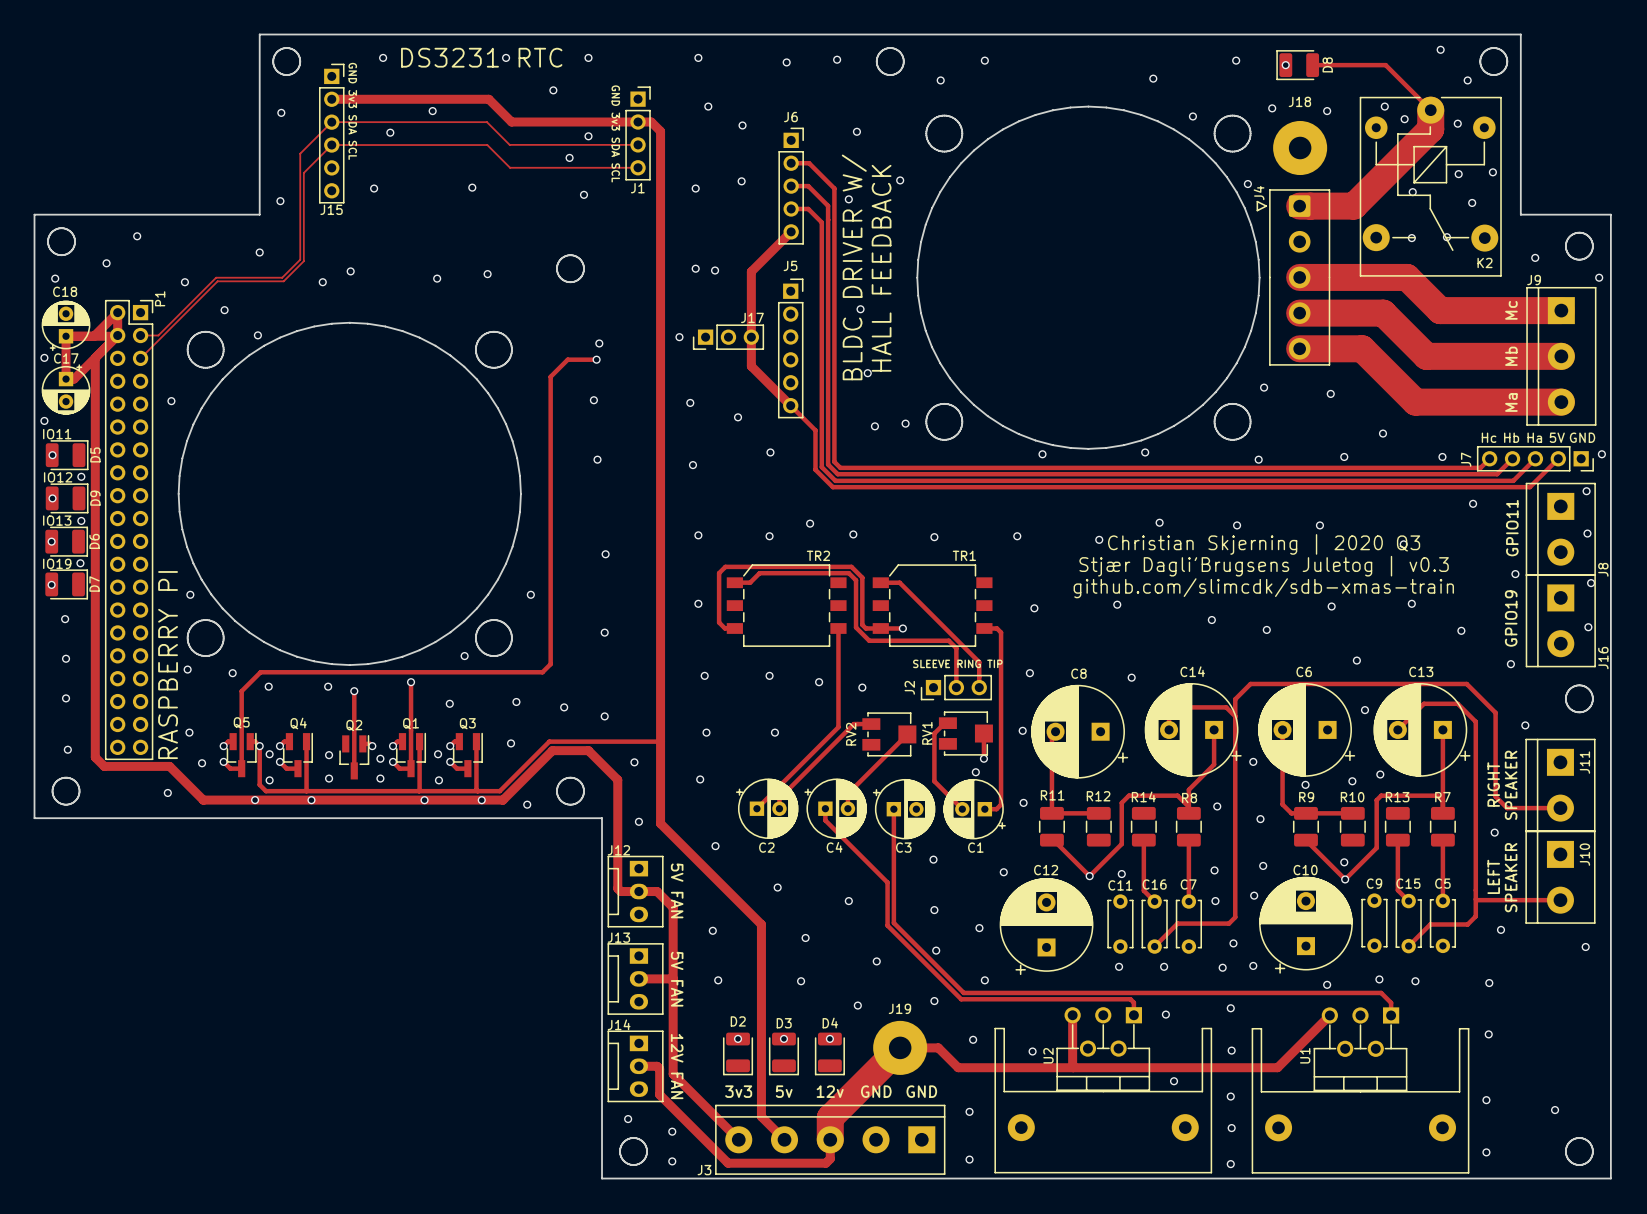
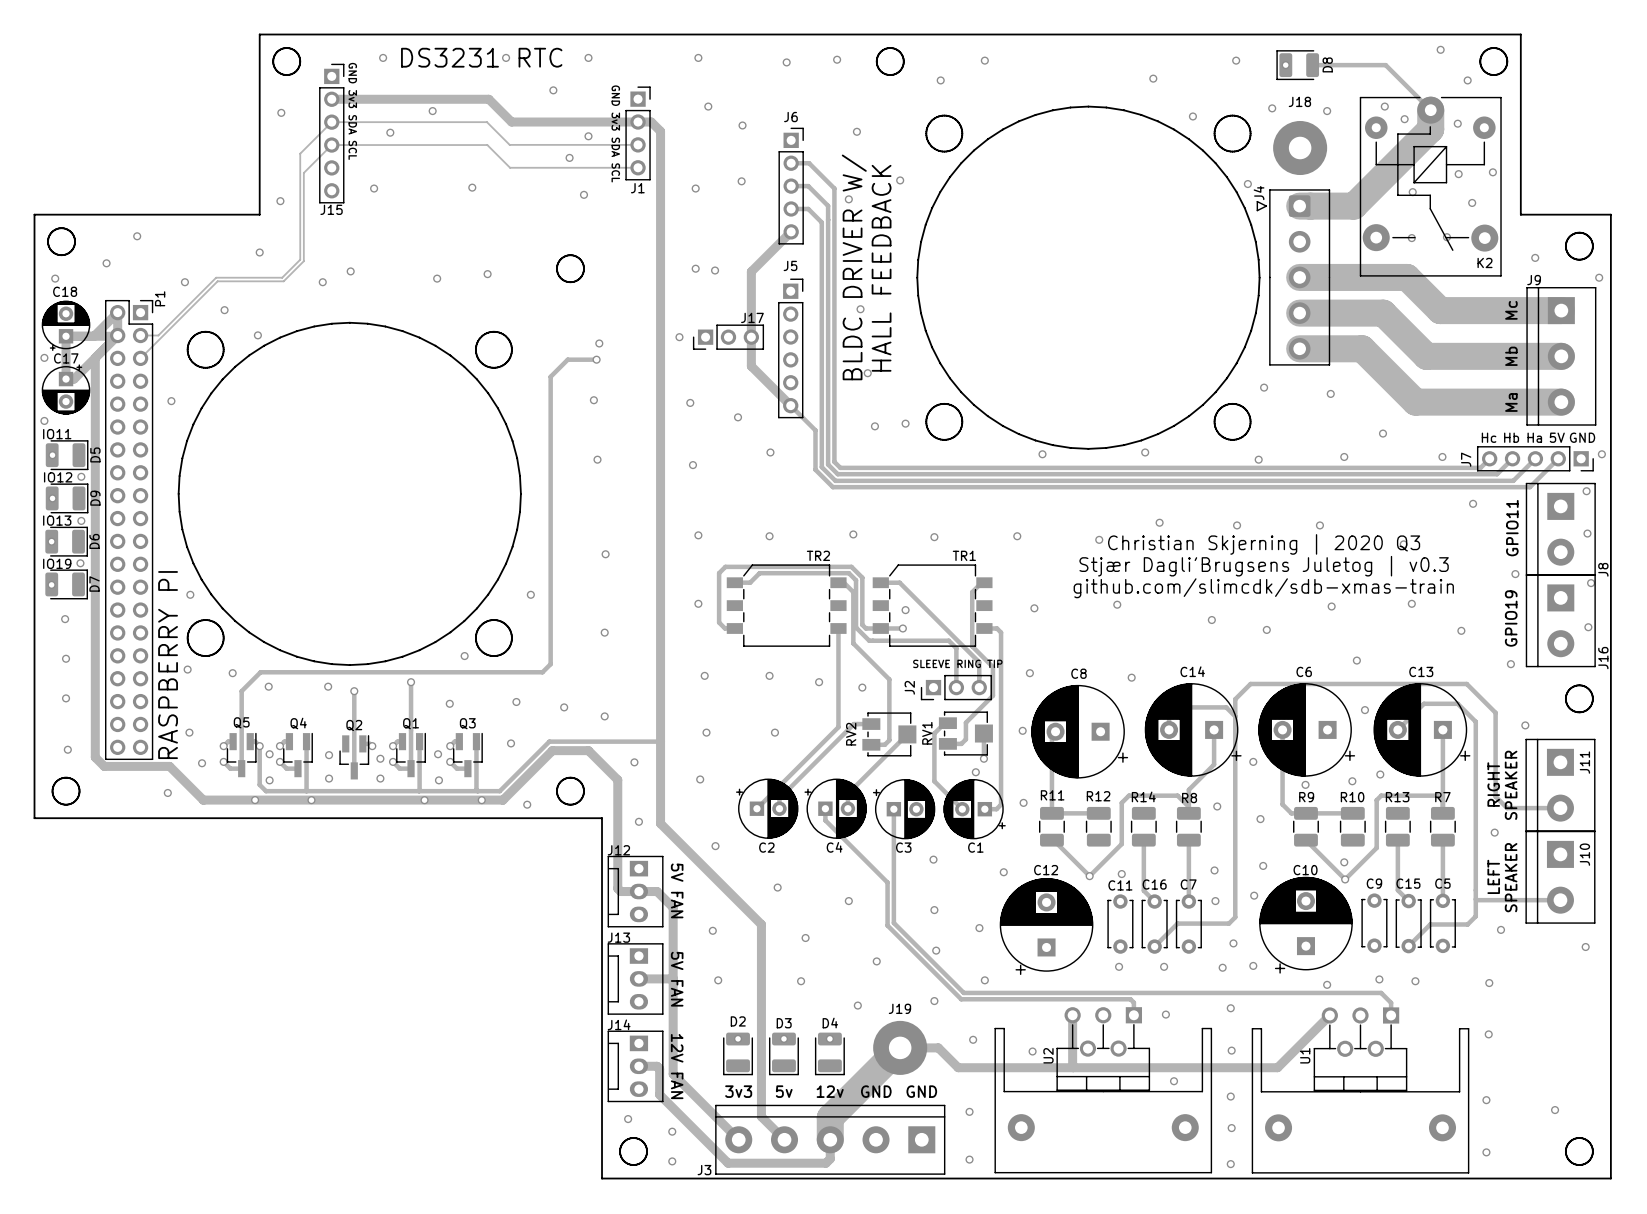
via: (810, 523) -> none
track: none -> (841, 582) (843, 582) (853, 592) (853, 643) (889, 679) (889, 740) (884, 744) (871, 744)
track: none -> (984, 582) (981, 582) (972, 592) (972, 646) (992, 667) (992, 695) (965, 722) (965, 739) (961, 743) (947, 743)
via: none -> (905, 610)

